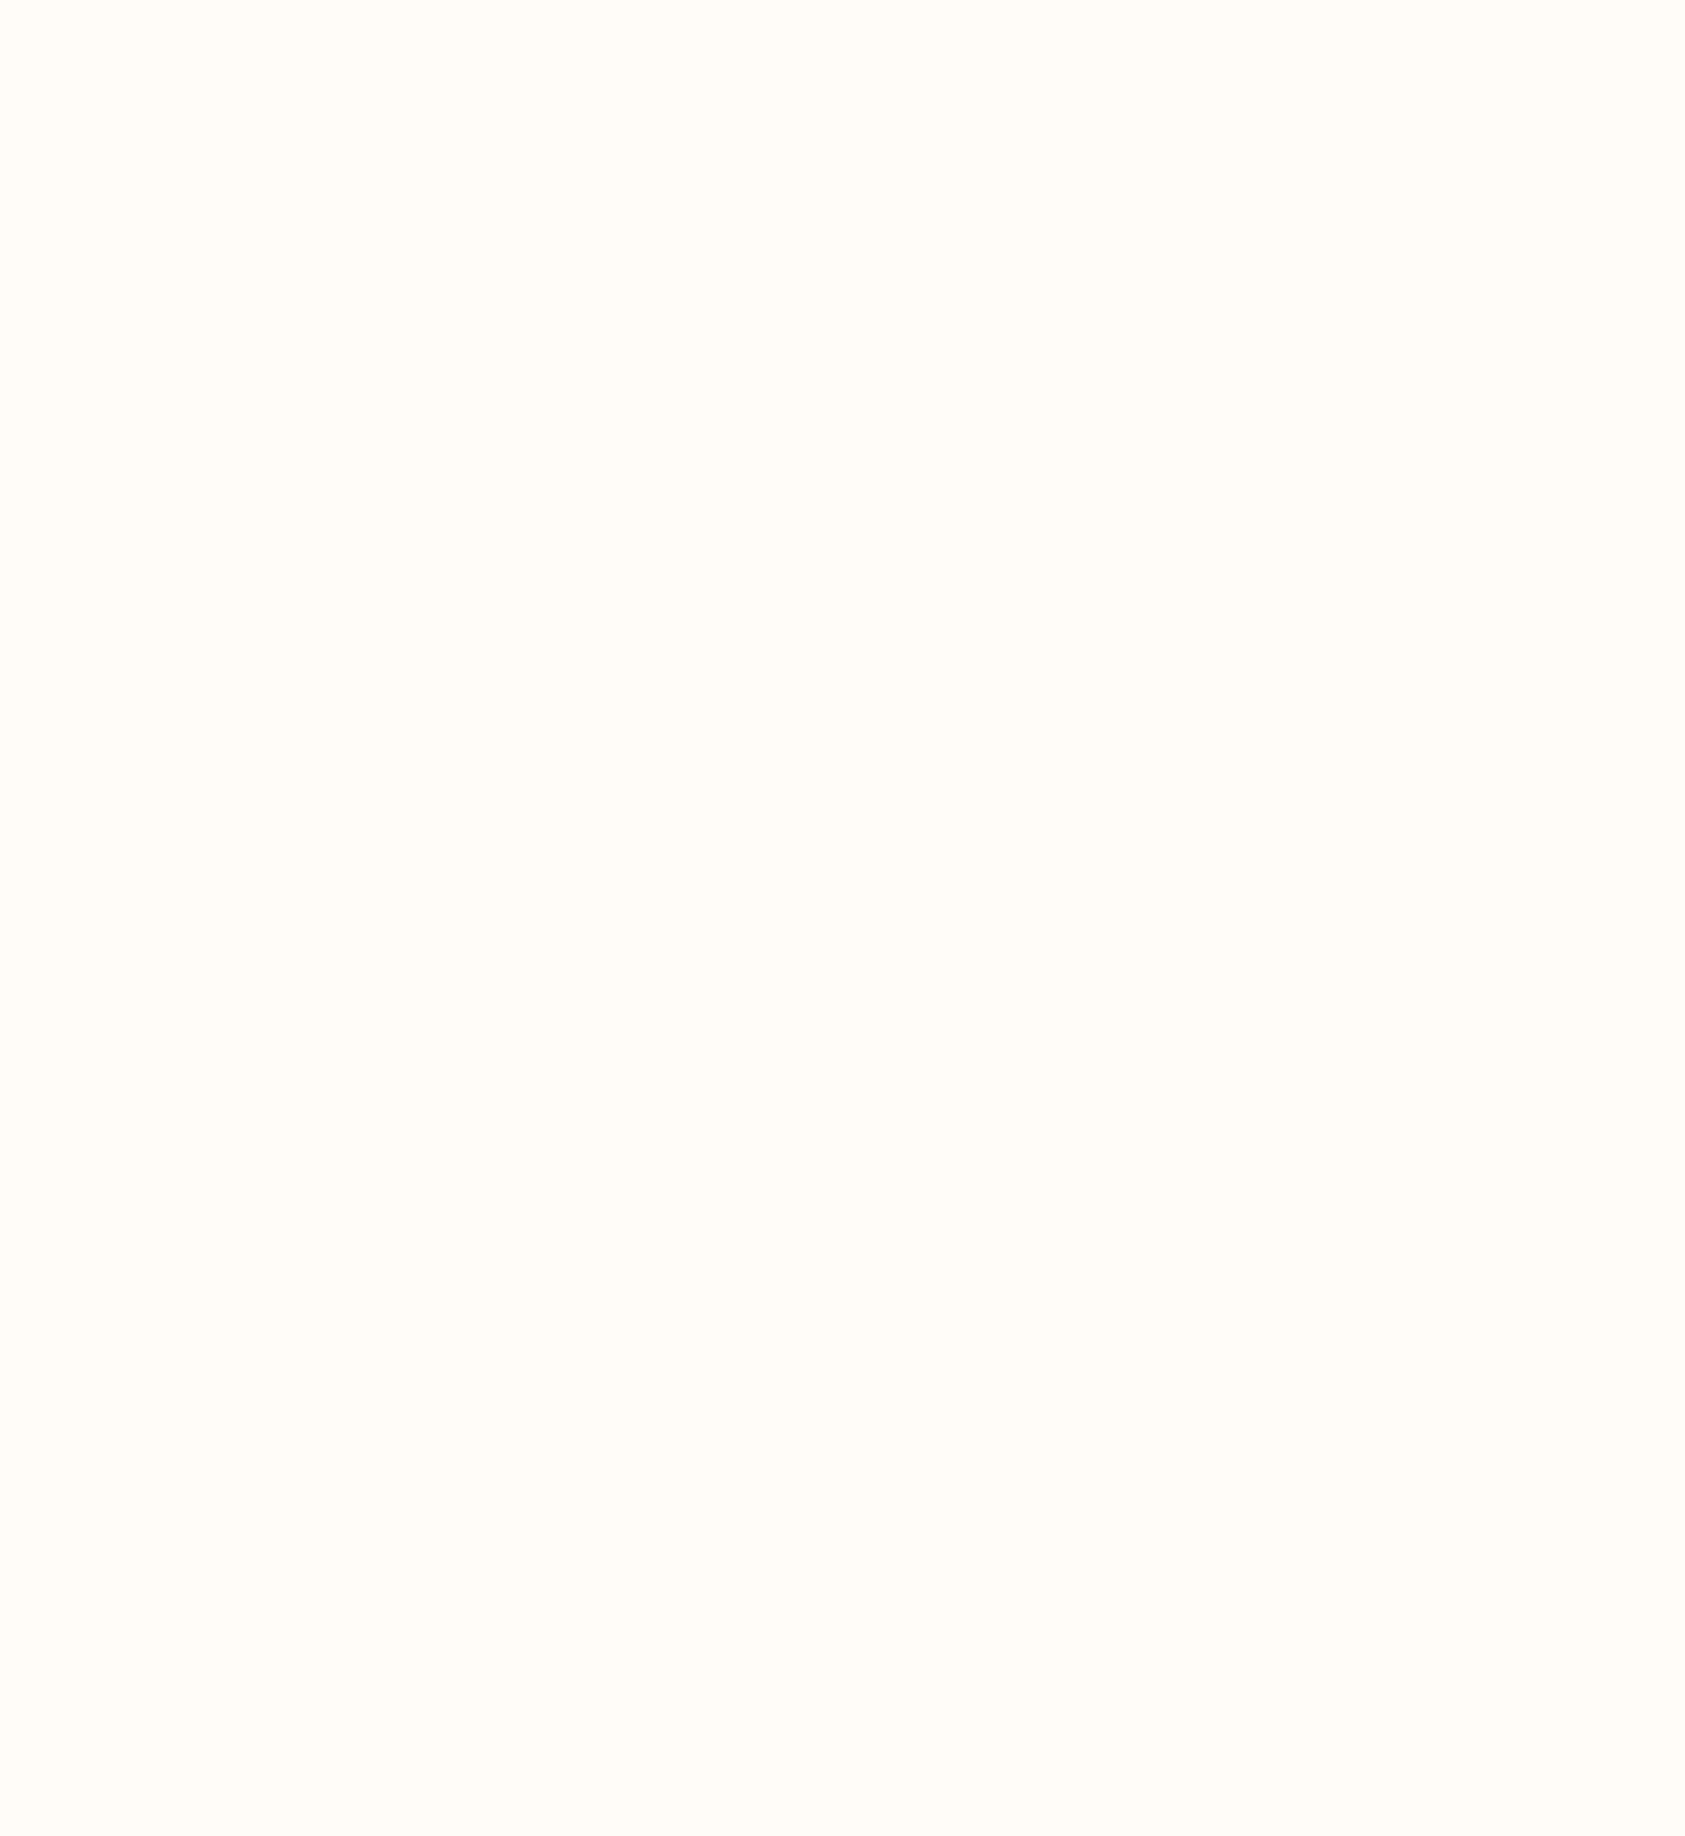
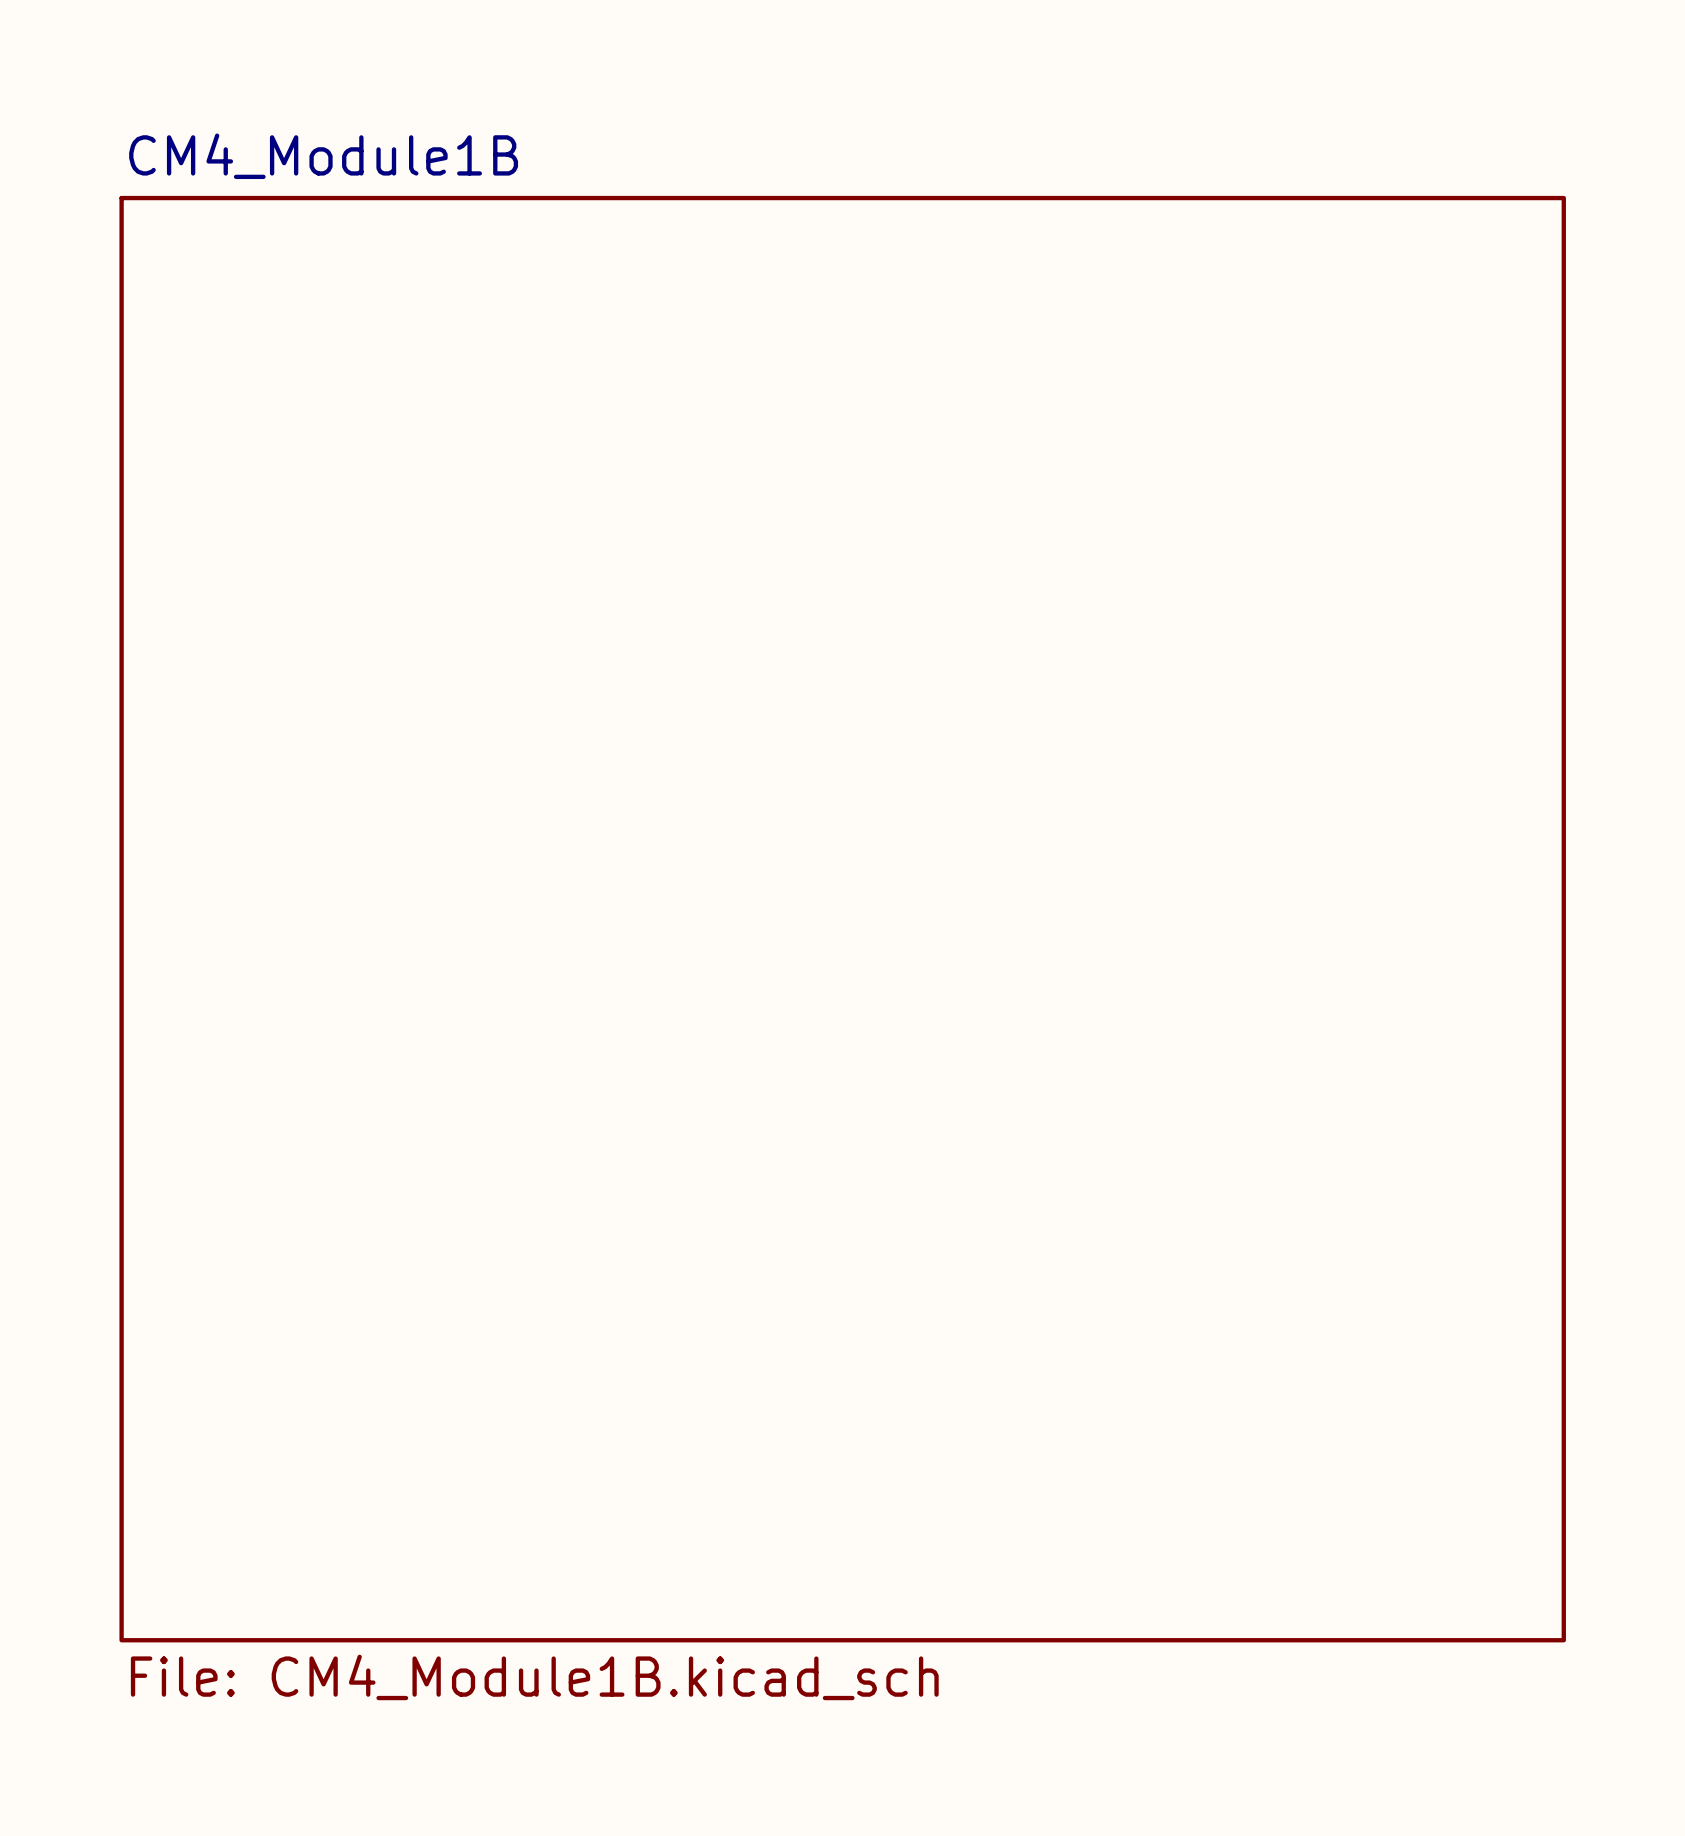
sheet CM4_Module1B: none -> File: CM4_Module1B.kicad_sch (842, 919)

